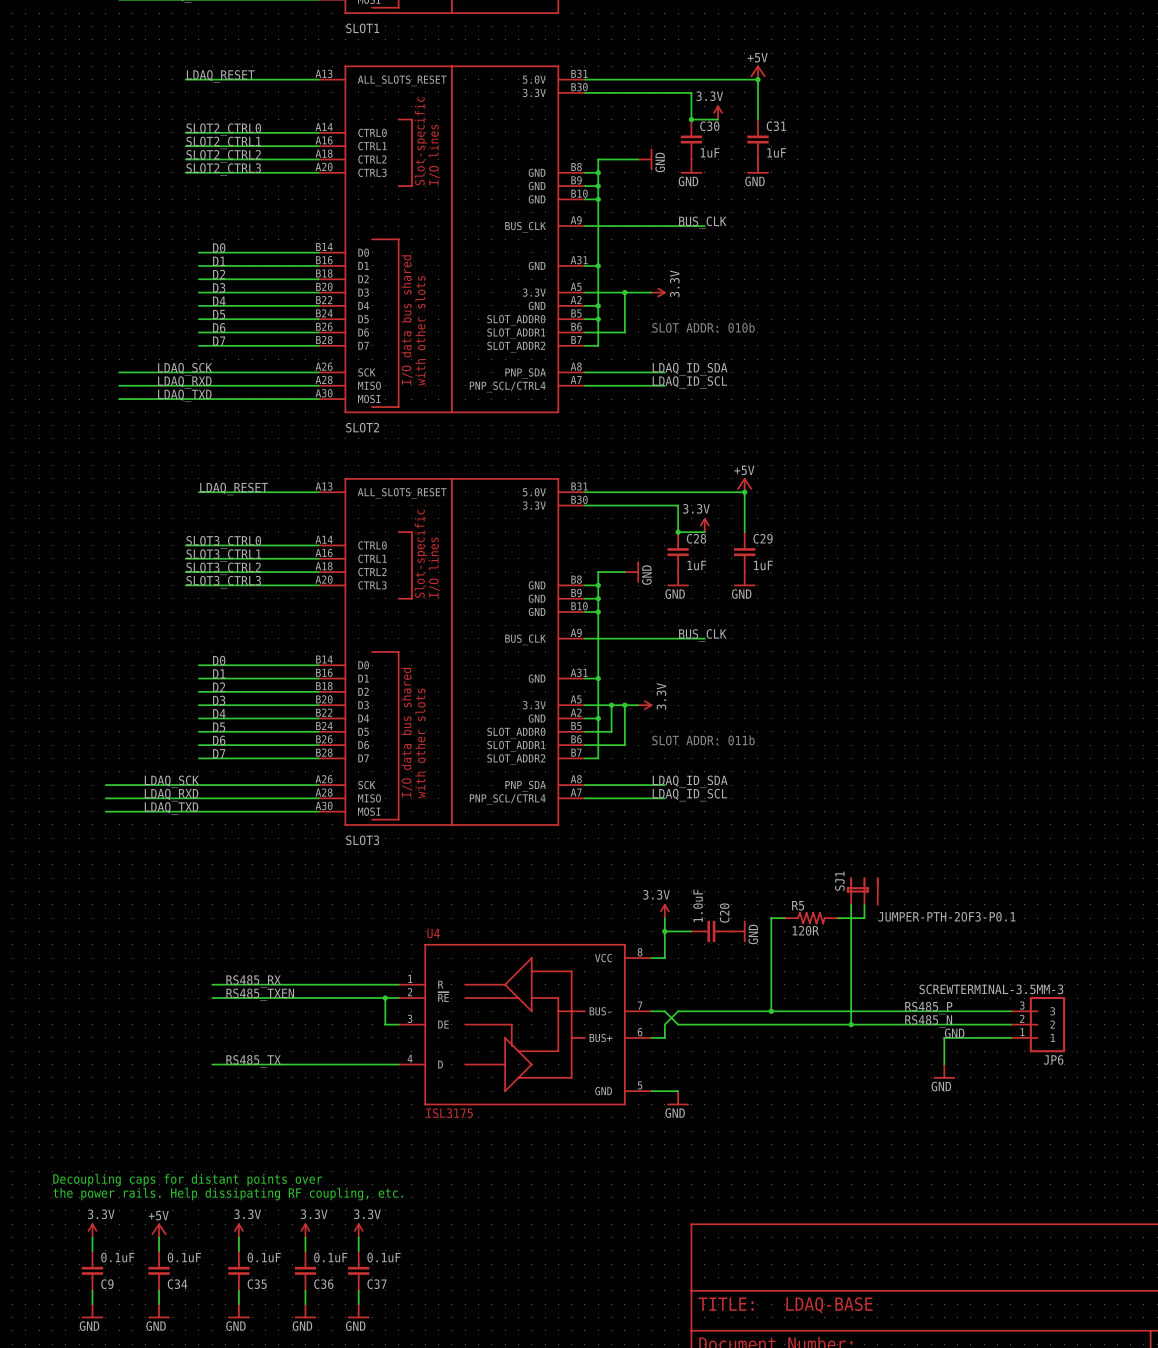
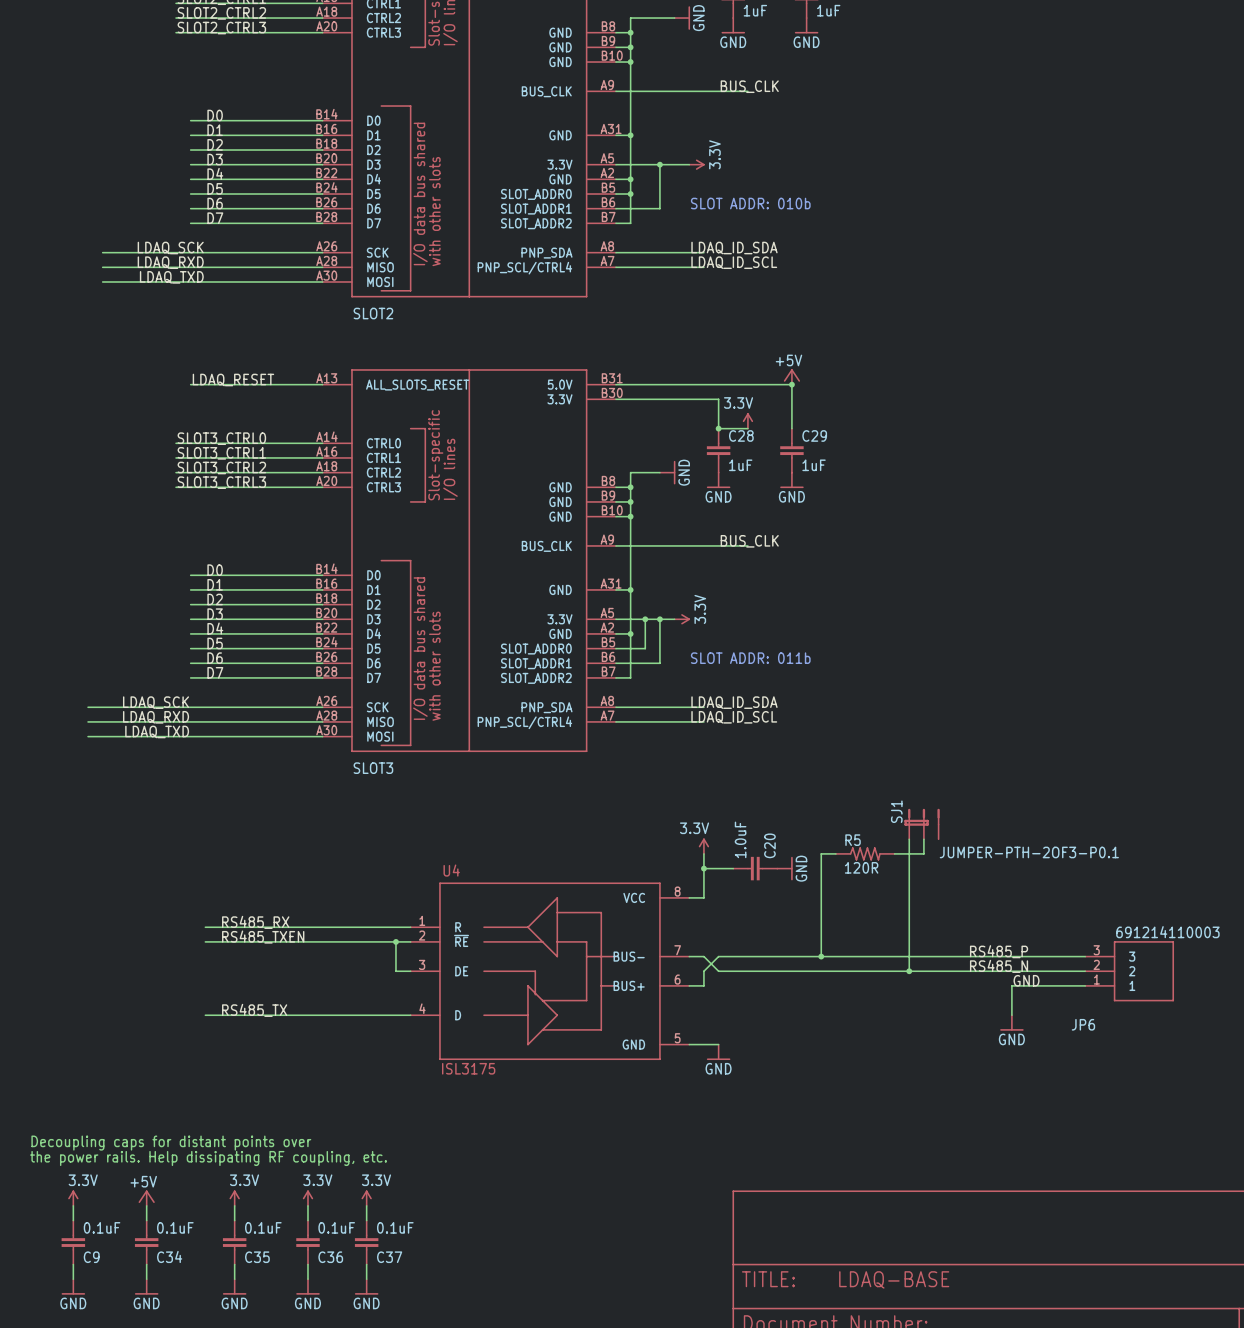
JP6 value: SCREWTERMINAL-3.5MM-3 (991, 989) -> 691214110003 (1167, 932)
JP6 symbol: [1010, 996, 1066, 1053] -> [1085, 941, 1174, 1002]
JP6 name position: JP6 (1053, 1059) -> JP6 (1083, 1024)

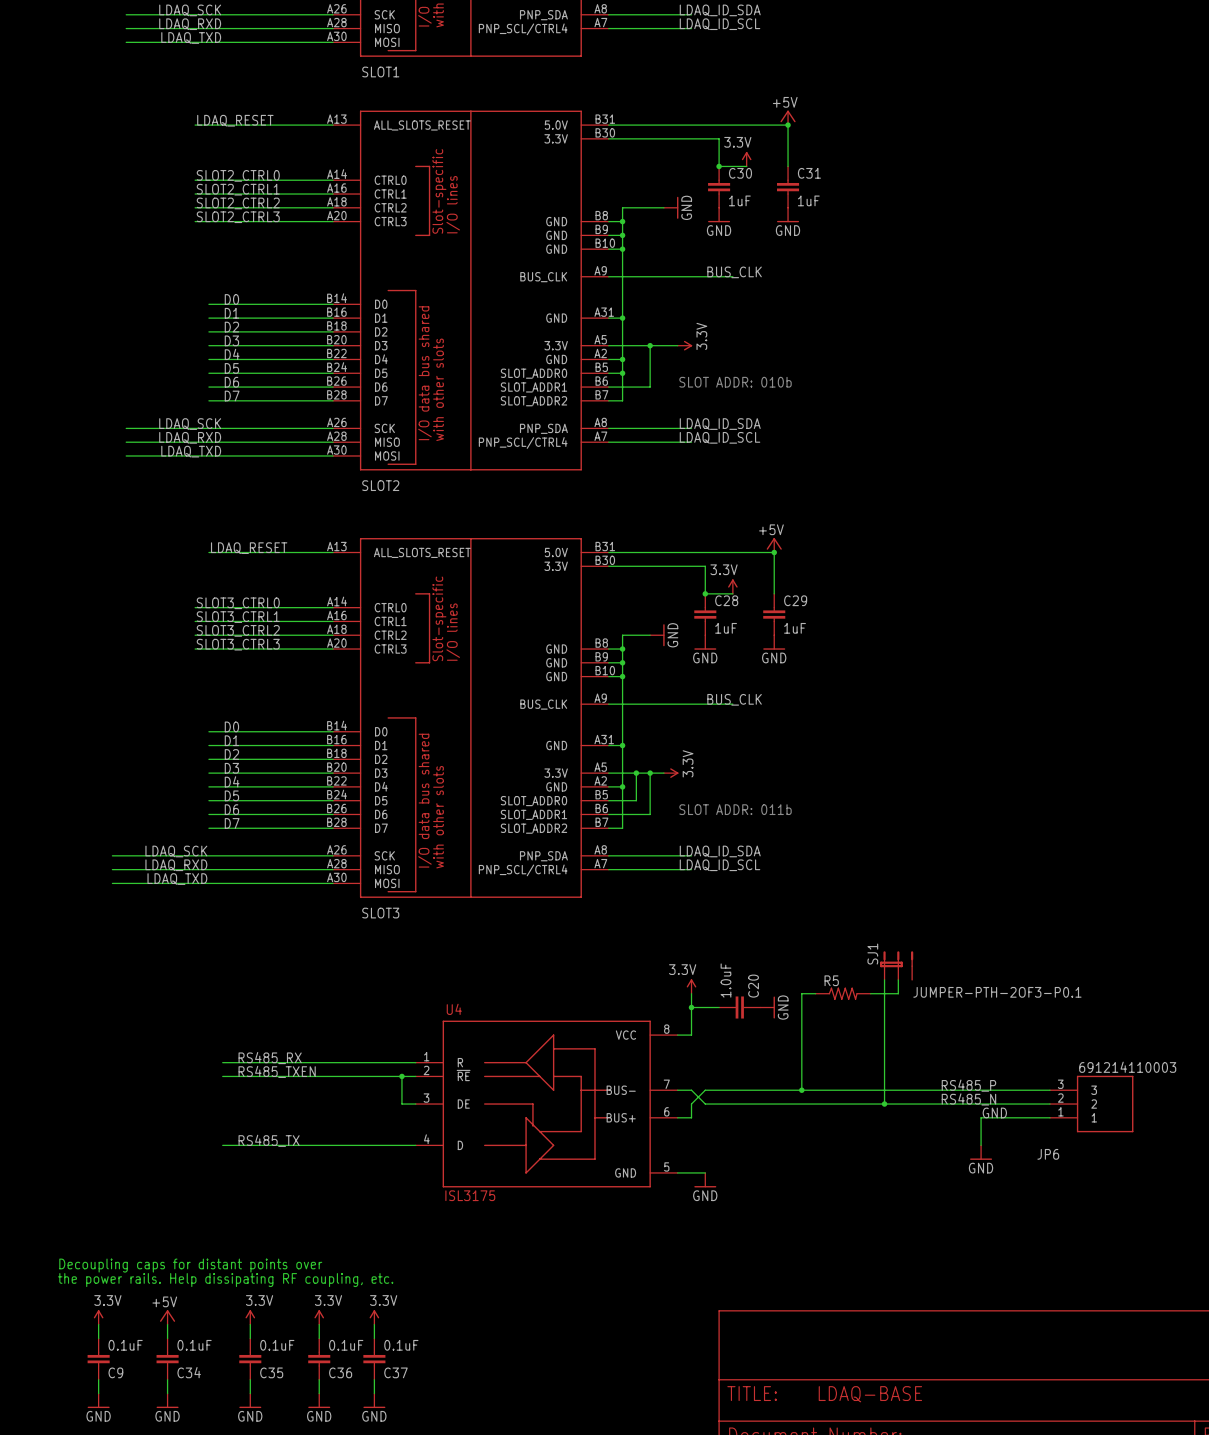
R5 value: 120R (861, 867) -> none

